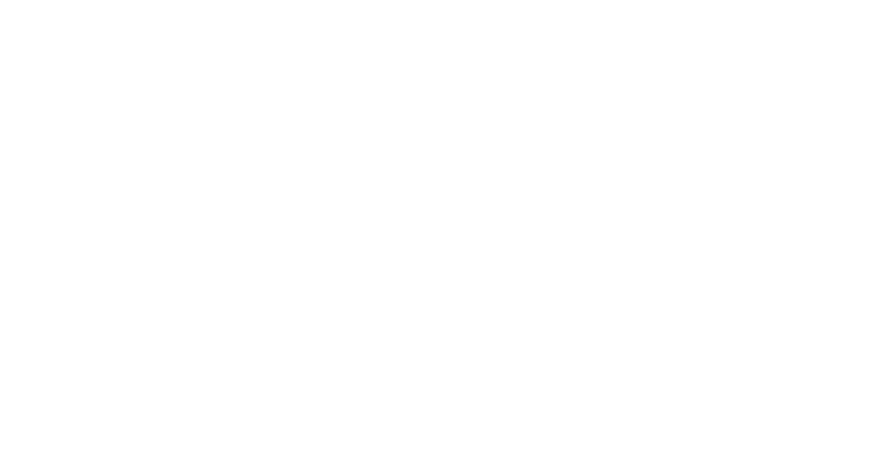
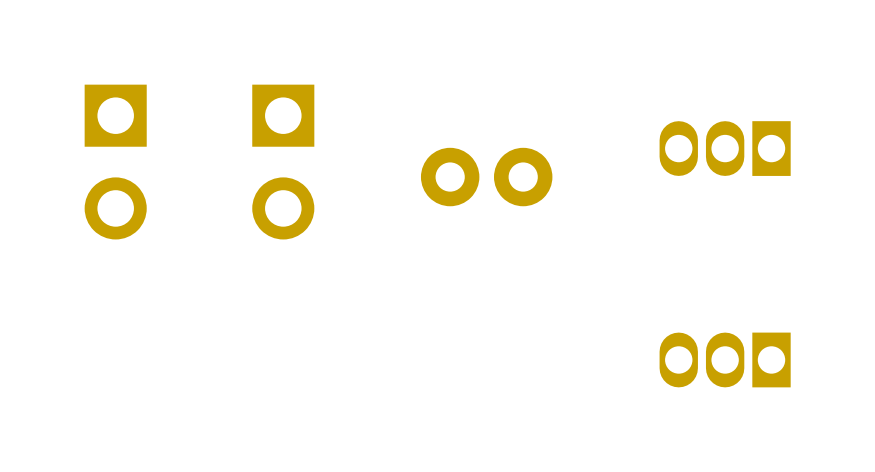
part: none -> (725, 148)
part: none -> (115, 162)
part: none -> (283, 162)
part: none -> (486, 177)
part: none -> (725, 359)

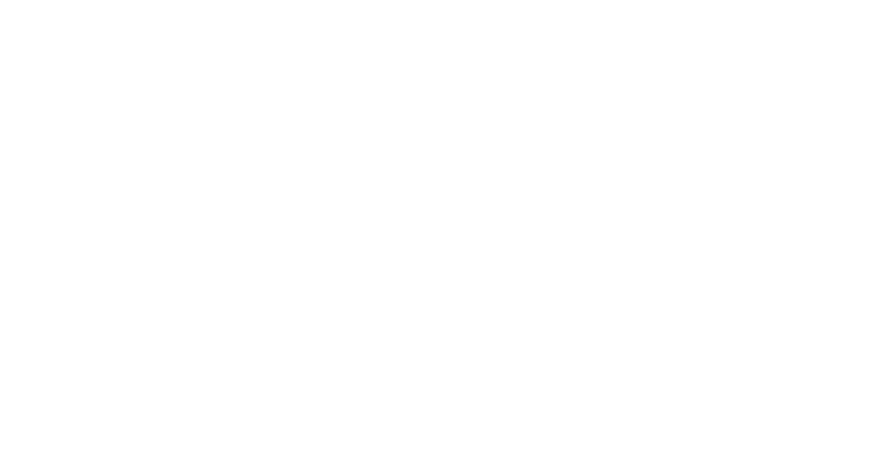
part: (725, 148) -> none
part: (115, 162) -> none
part: (283, 162) -> none
part: (486, 177) -> none
part: (725, 359) -> none

